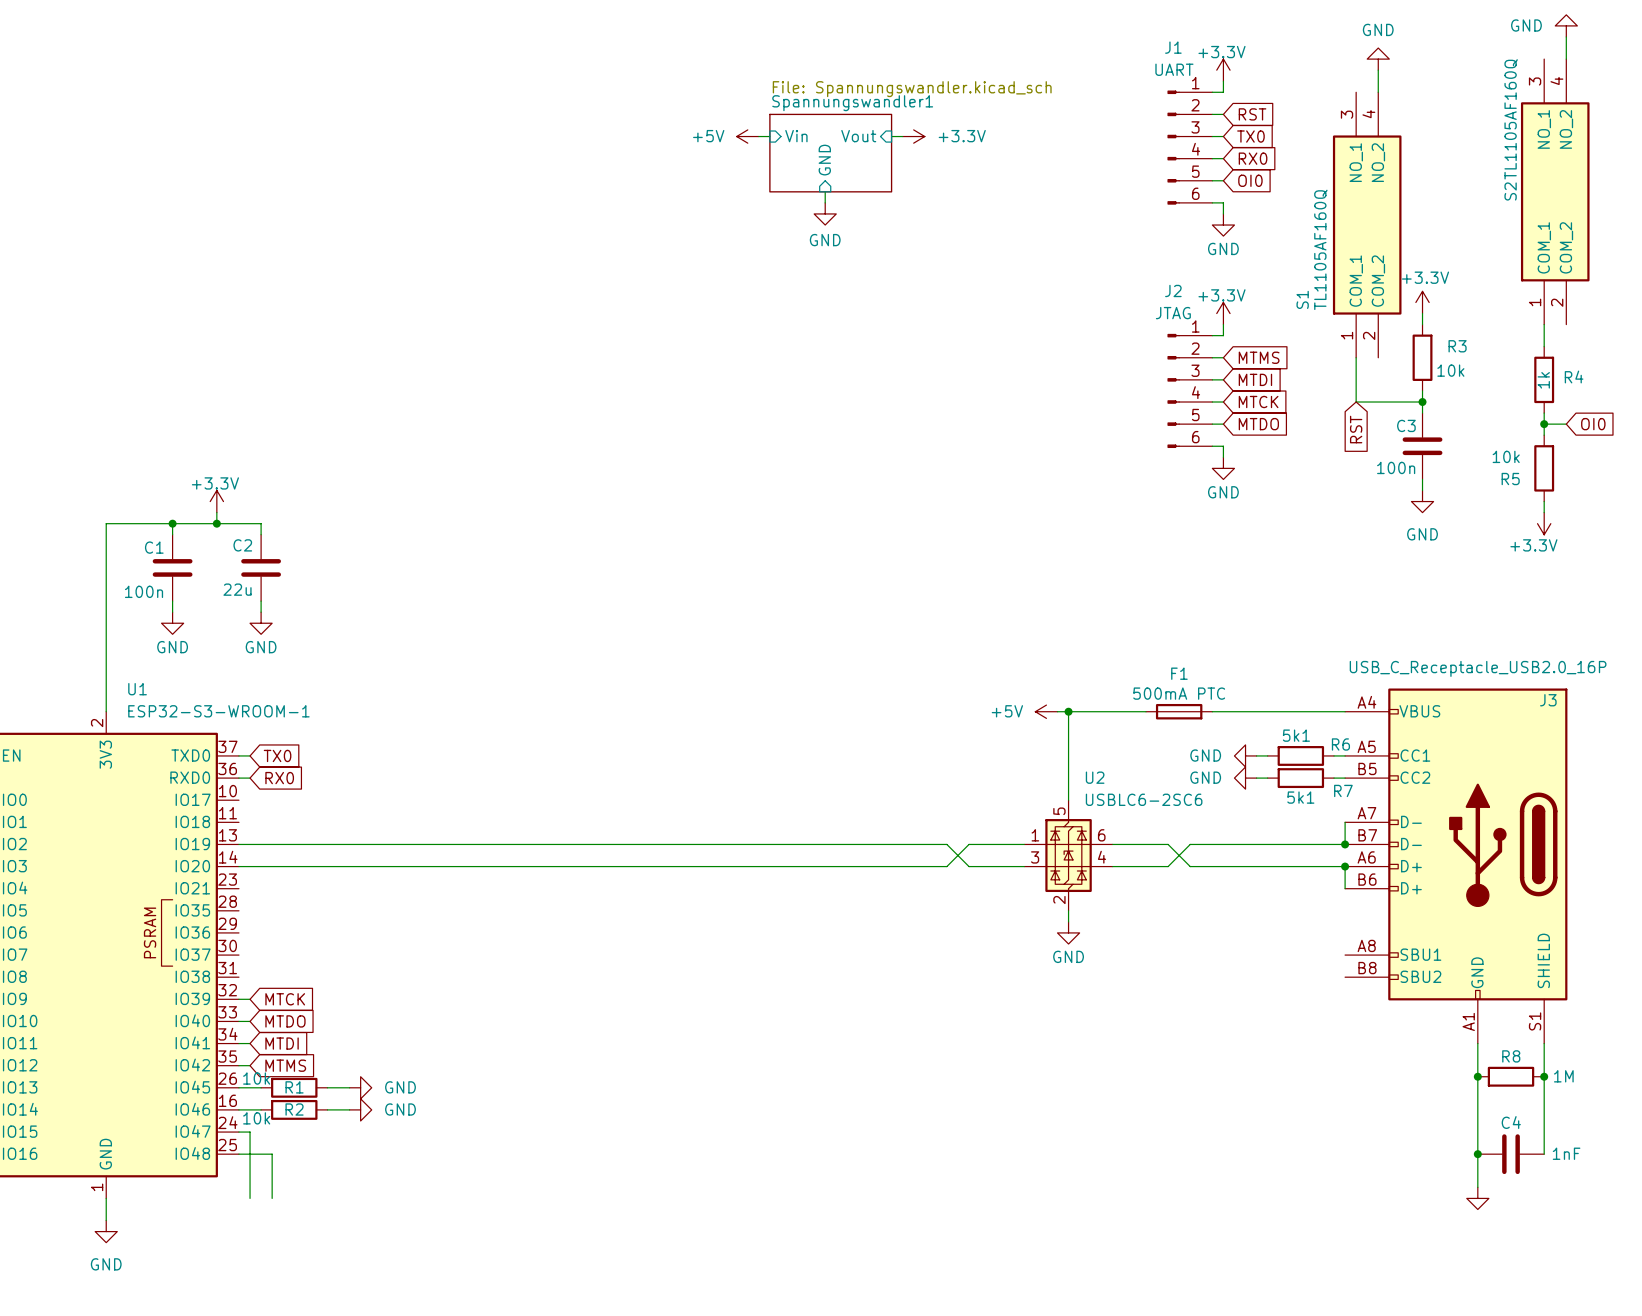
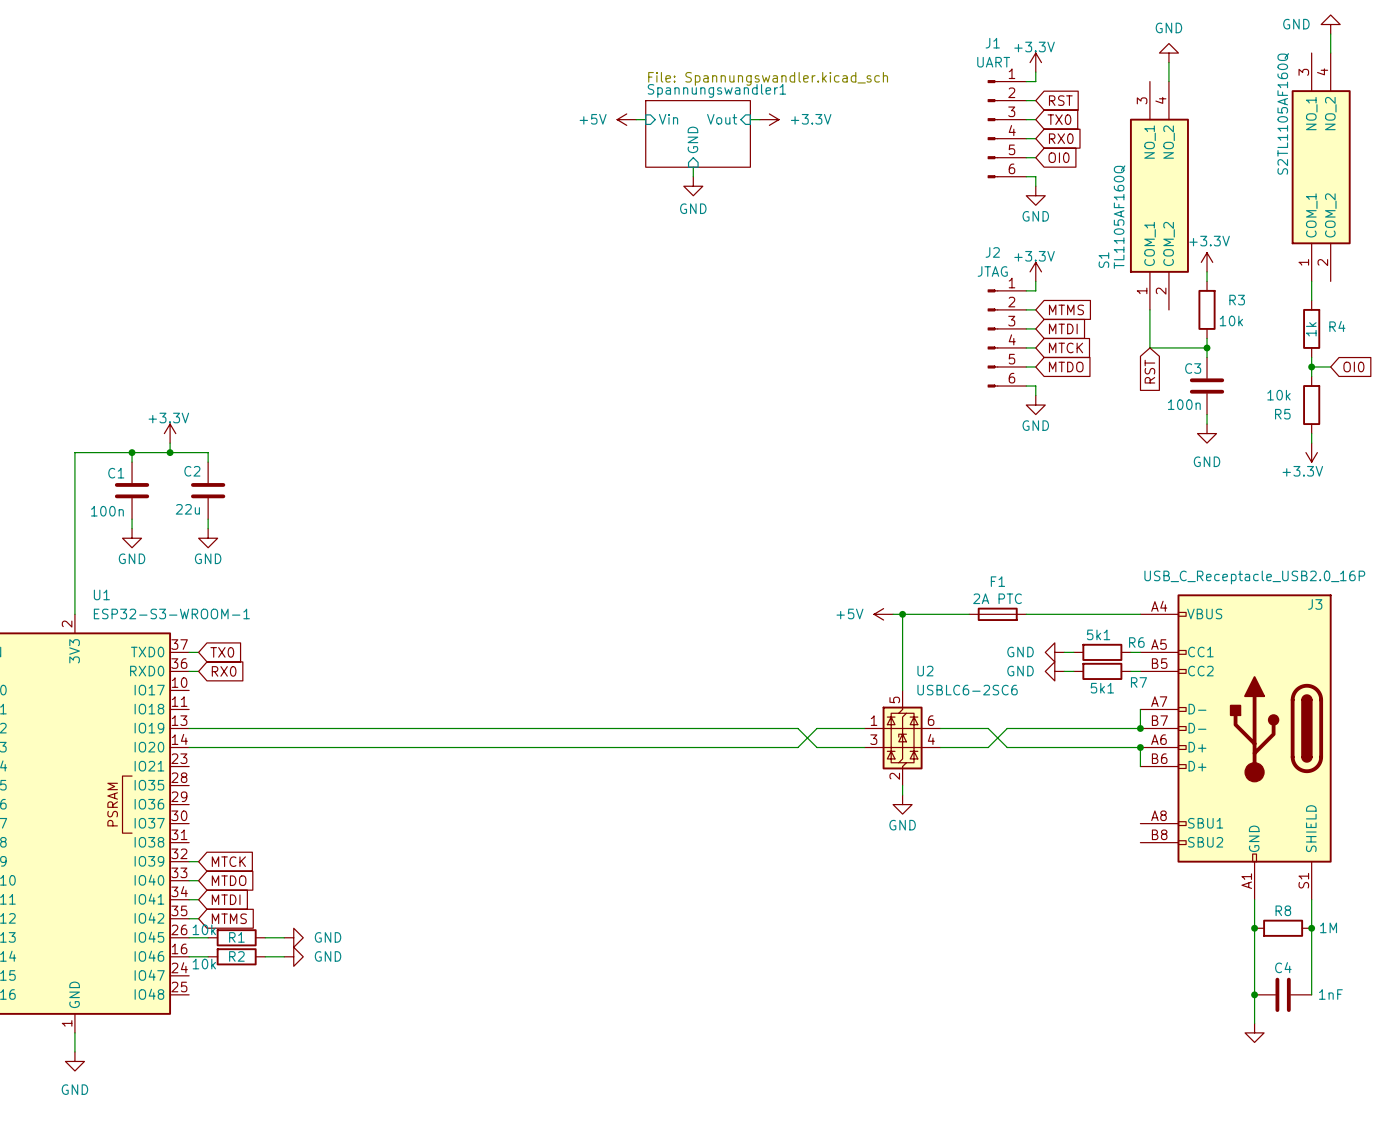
F1 value: 500mA PTC (1179, 693) -> 2A PTC (997, 598)
wire: (238, 1132) (250, 1132) (250, 1198) -> none
wire: (238, 1154) (272, 1154) (272, 1198) -> none

